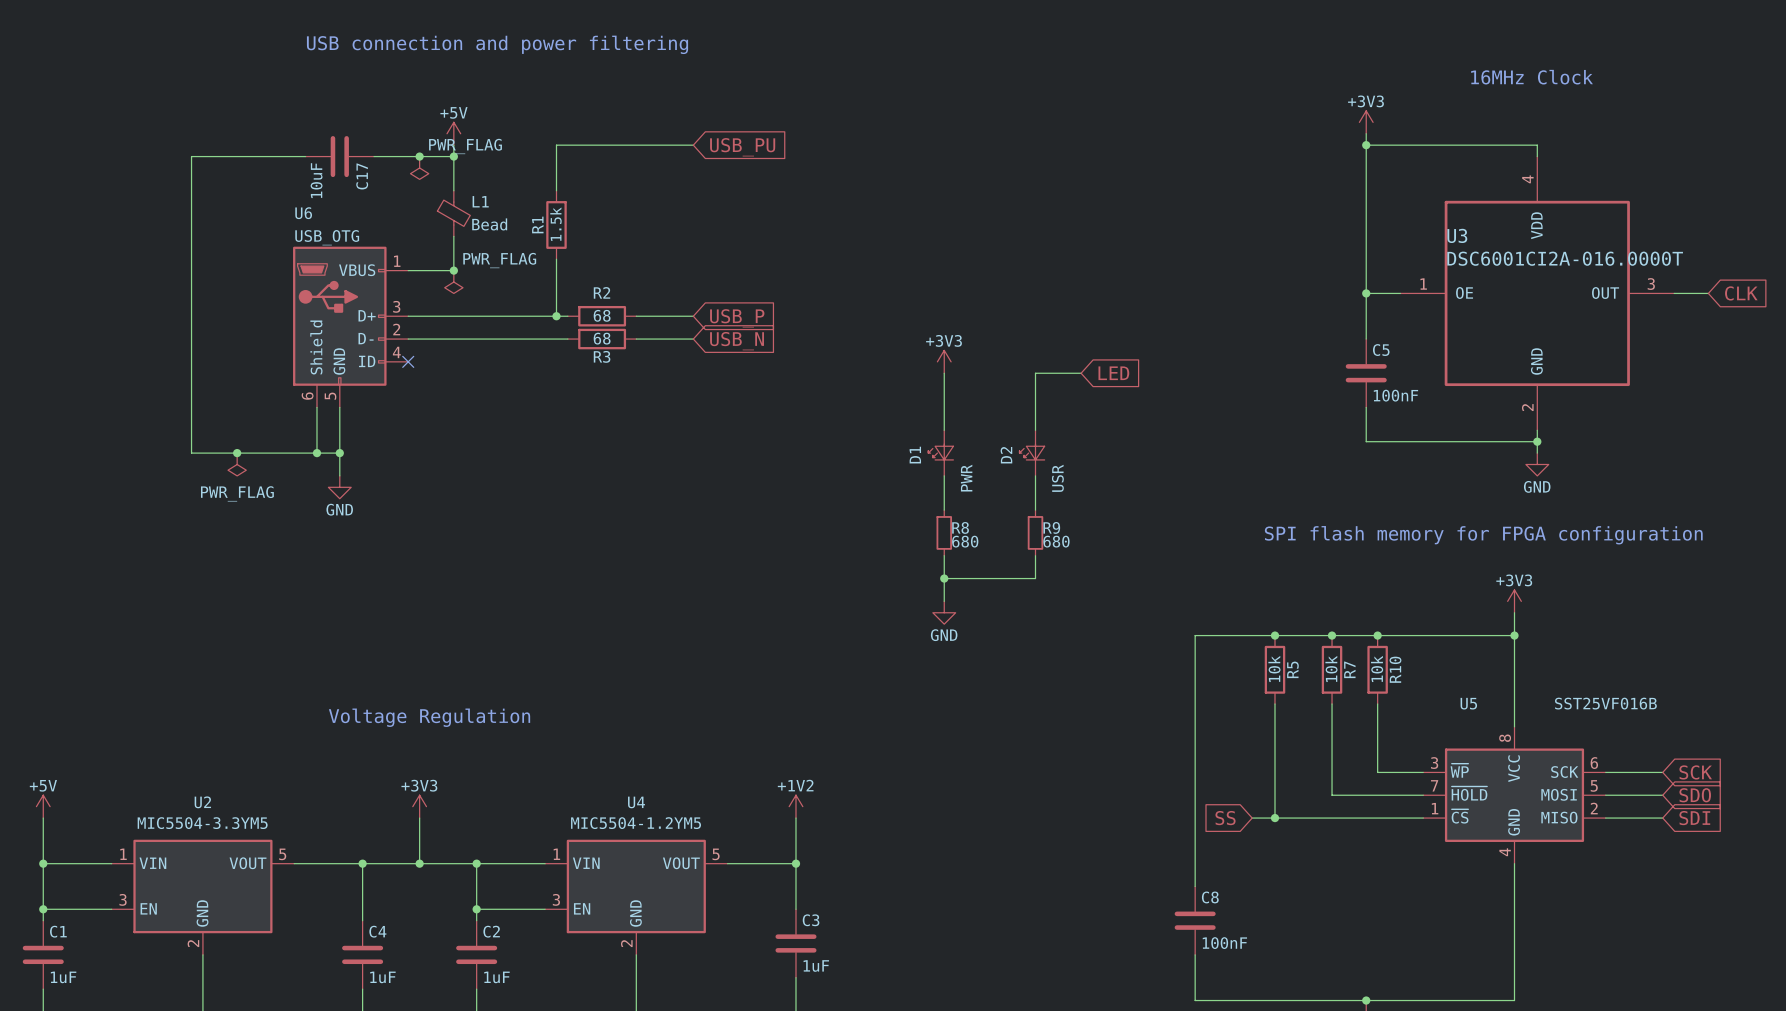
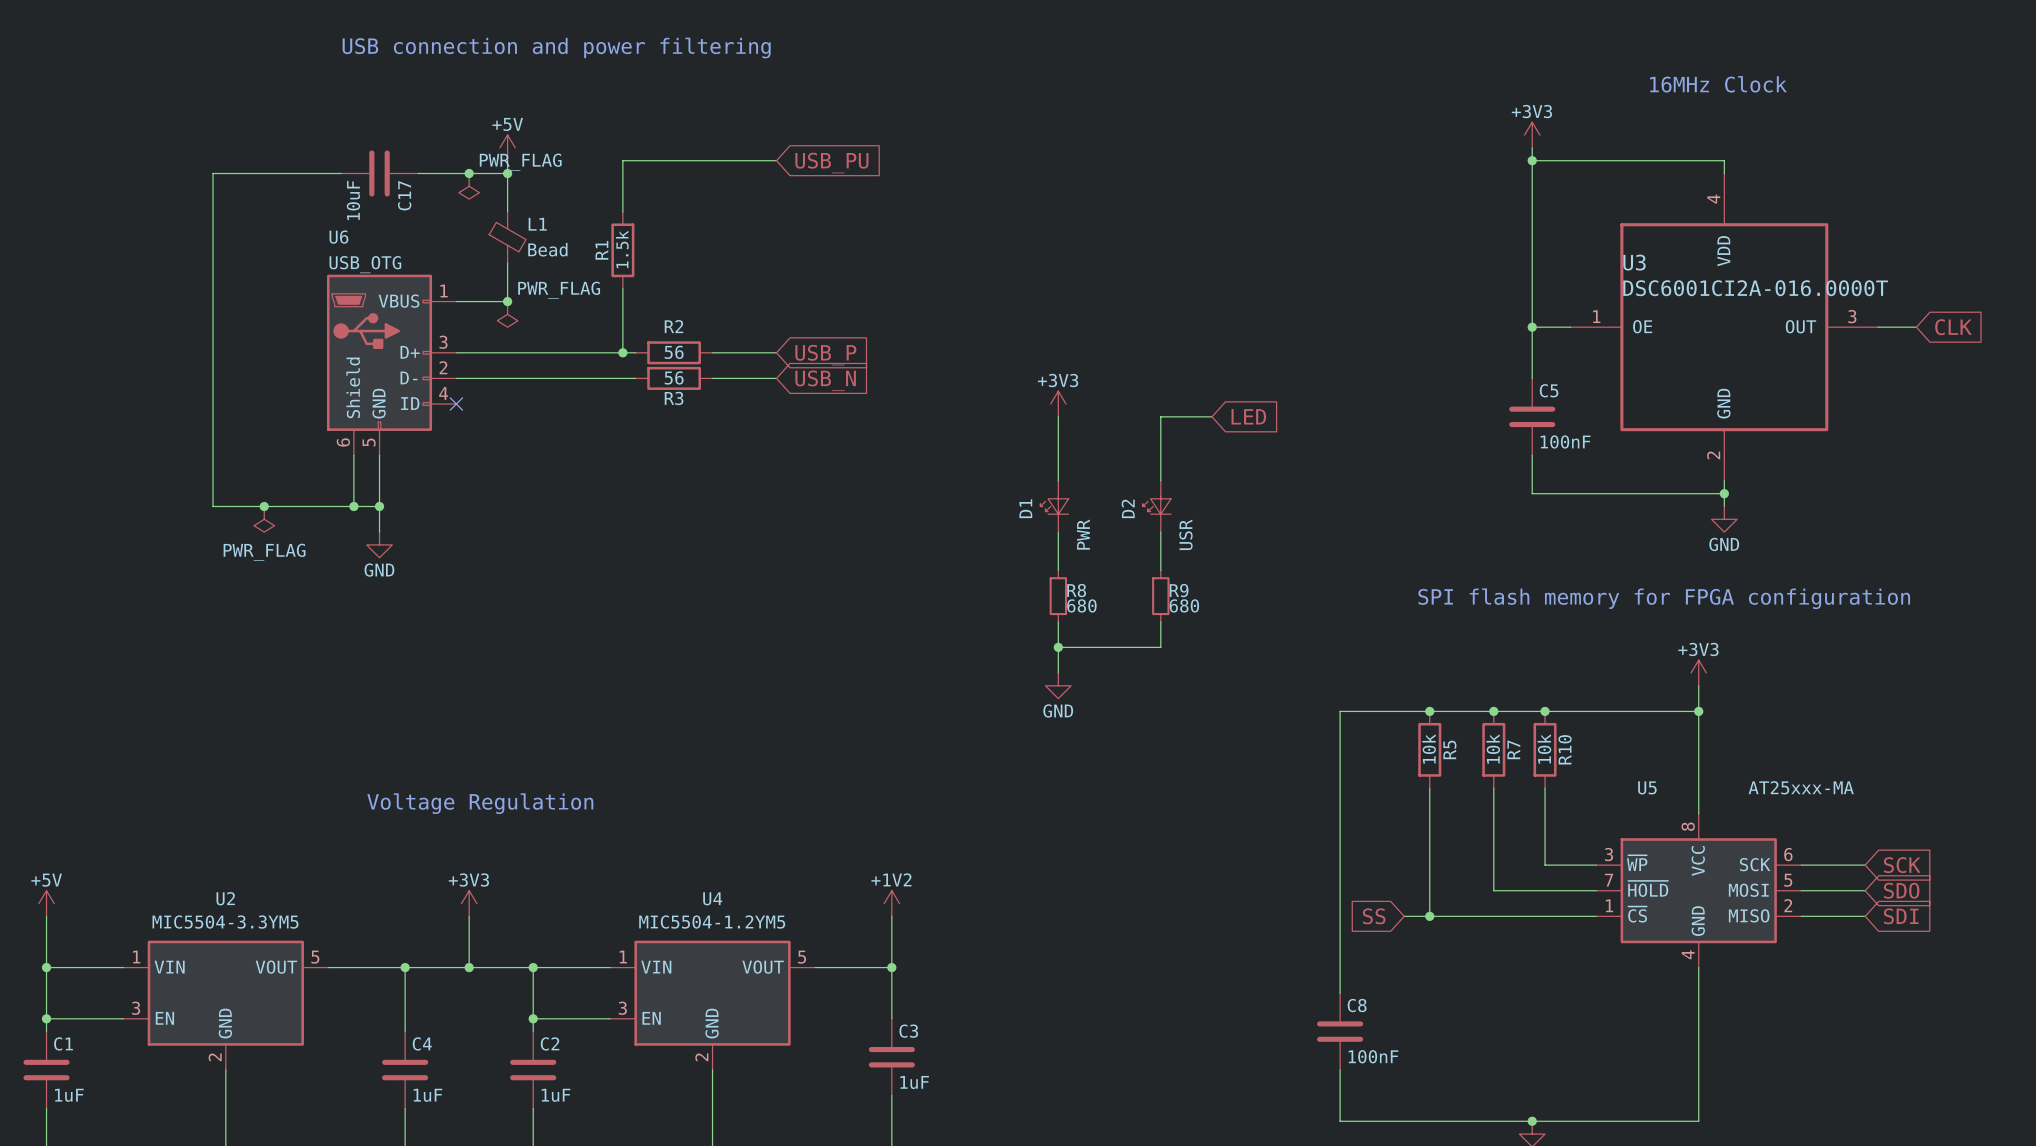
R2 value: 68 (602, 315) -> 56 (674, 352)
R3 value: 68 (602, 338) -> 56 (674, 377)
U5 value: SST25VF016B (1605, 703) -> AT25xxx-MA (1801, 787)

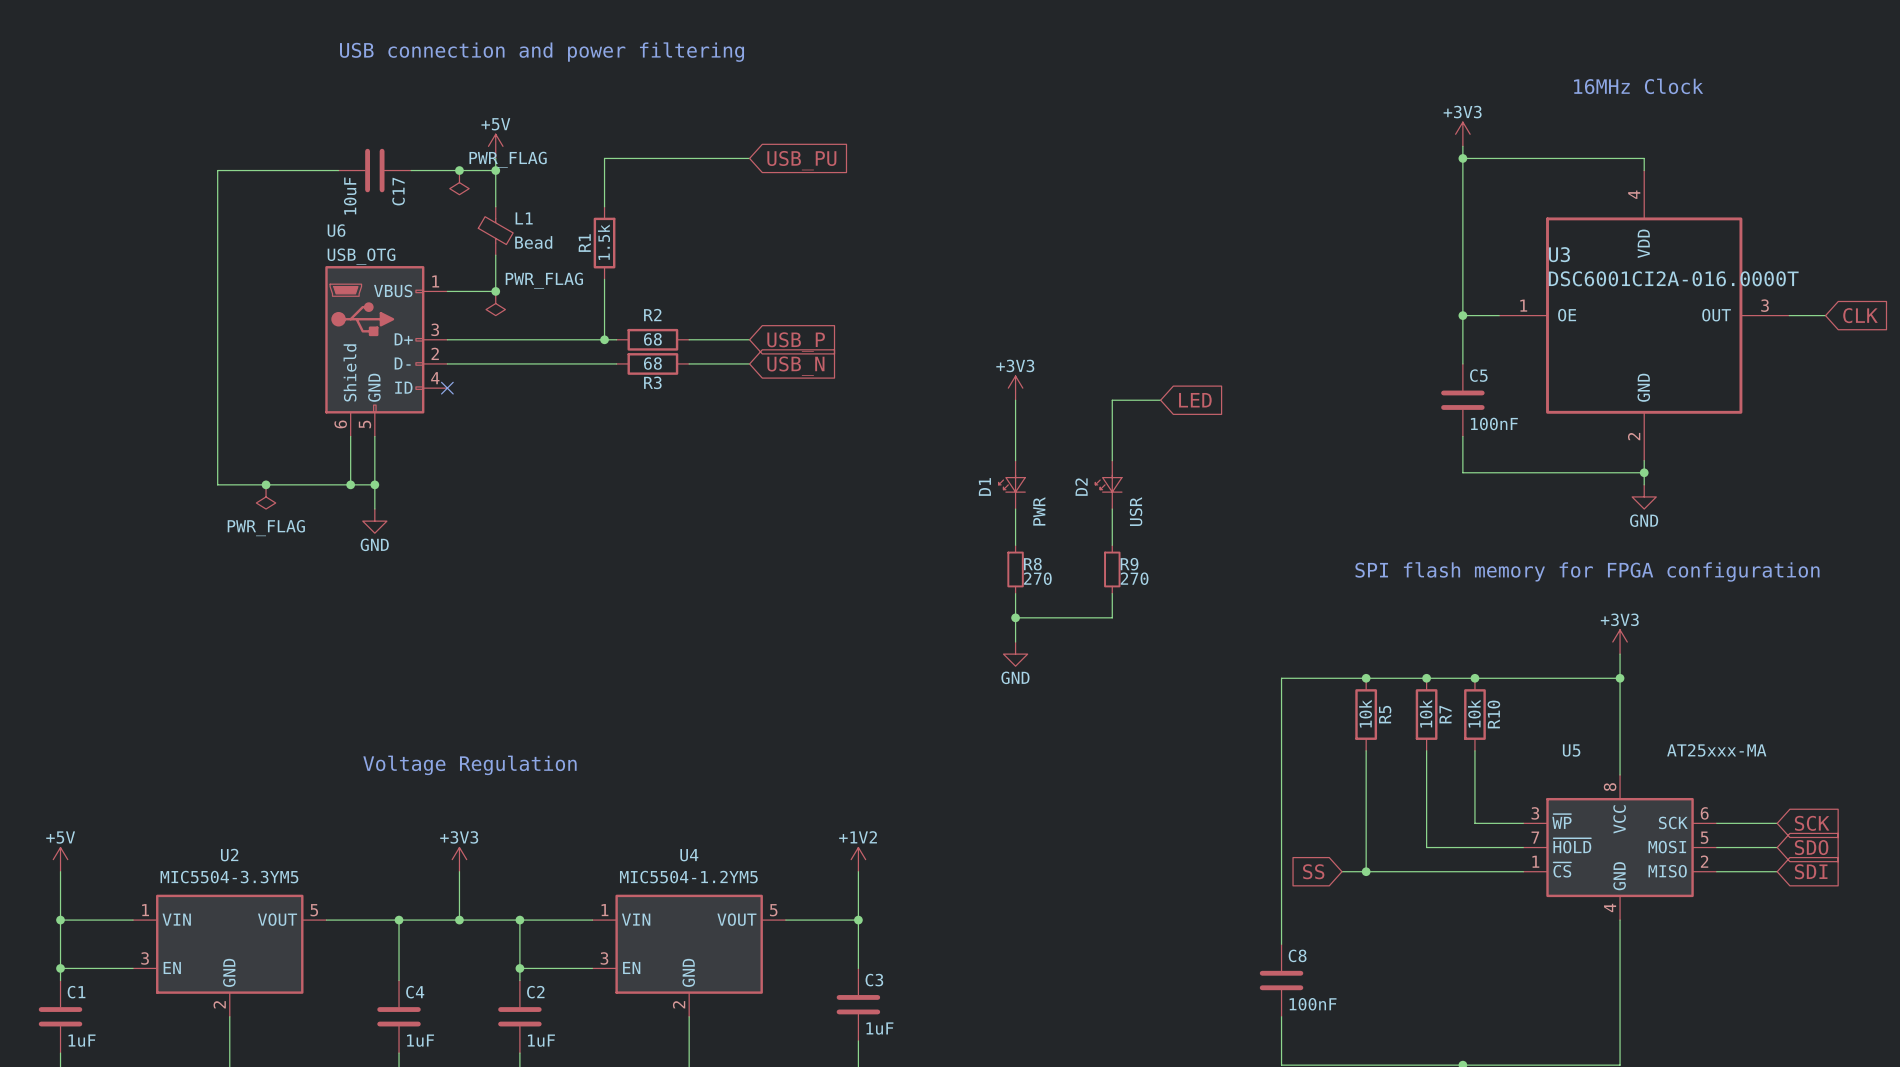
R2 value: 56 (674, 352) -> 68 (652, 339)
R3 value: 56 (674, 377) -> 68 (652, 363)
R8 value: 680 (1081, 605) -> 270 (1037, 578)
R9 value: 680 (1184, 605) -> 270 (1134, 578)

